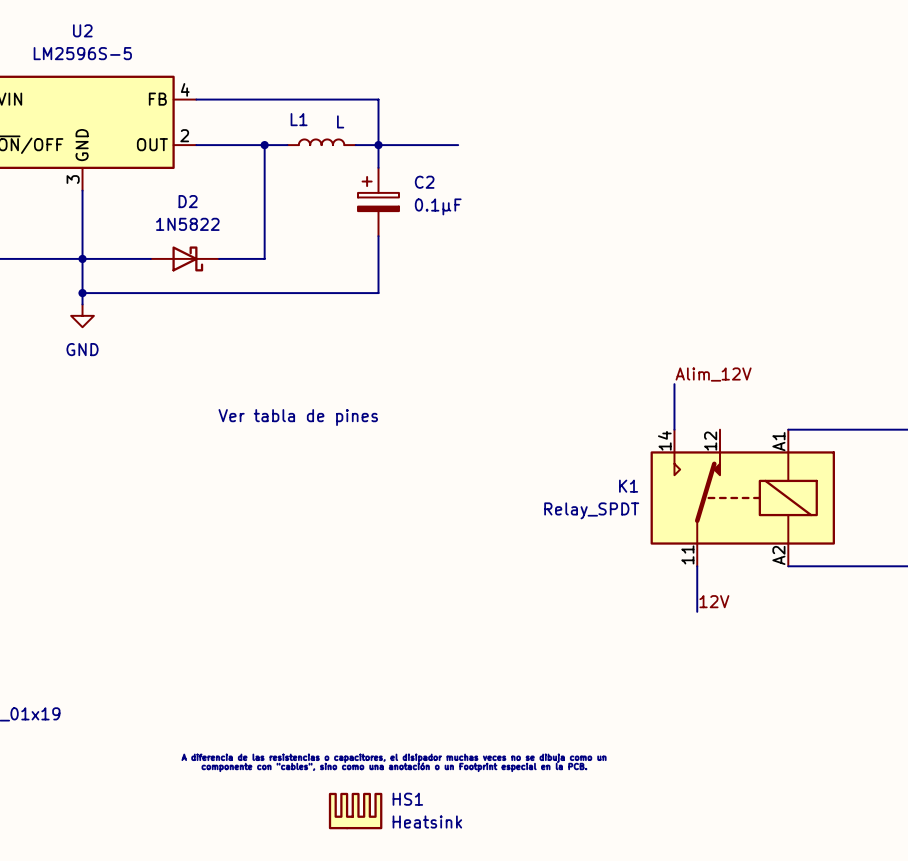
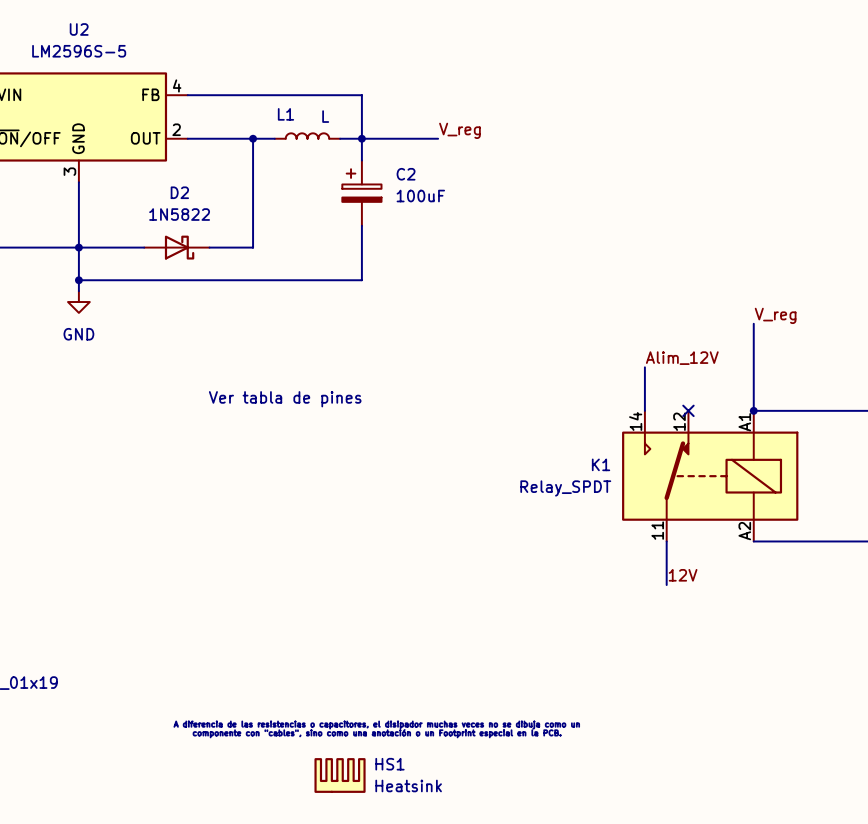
label: none -> V_reg (459, 130)
C2 value: 0.1µF (438, 206) -> 100uF (420, 196)
label: none -> V_reg (775, 315)
wire: none -> (753, 323) (753, 410)
no-connect mark: none -> (688, 410)
junction: none -> (753, 410)

